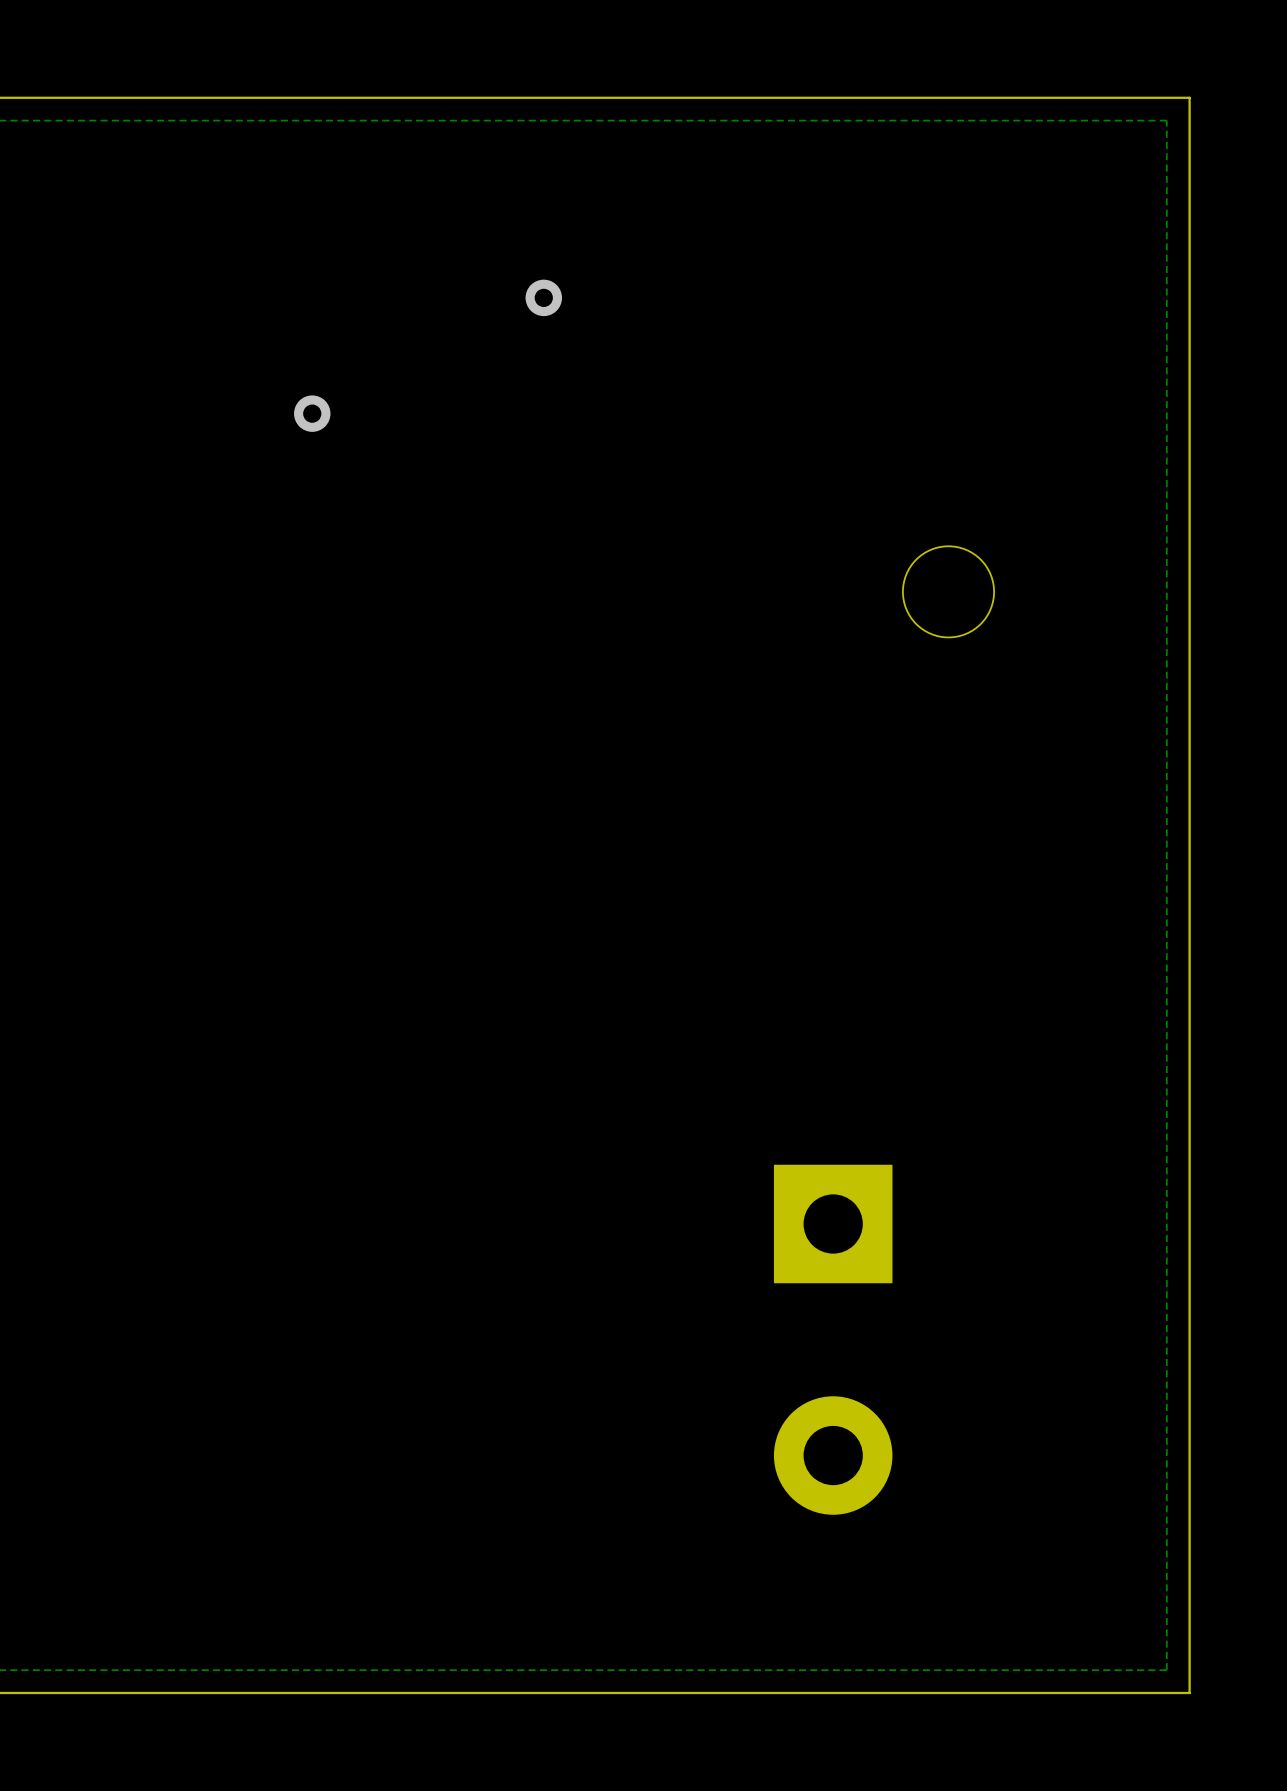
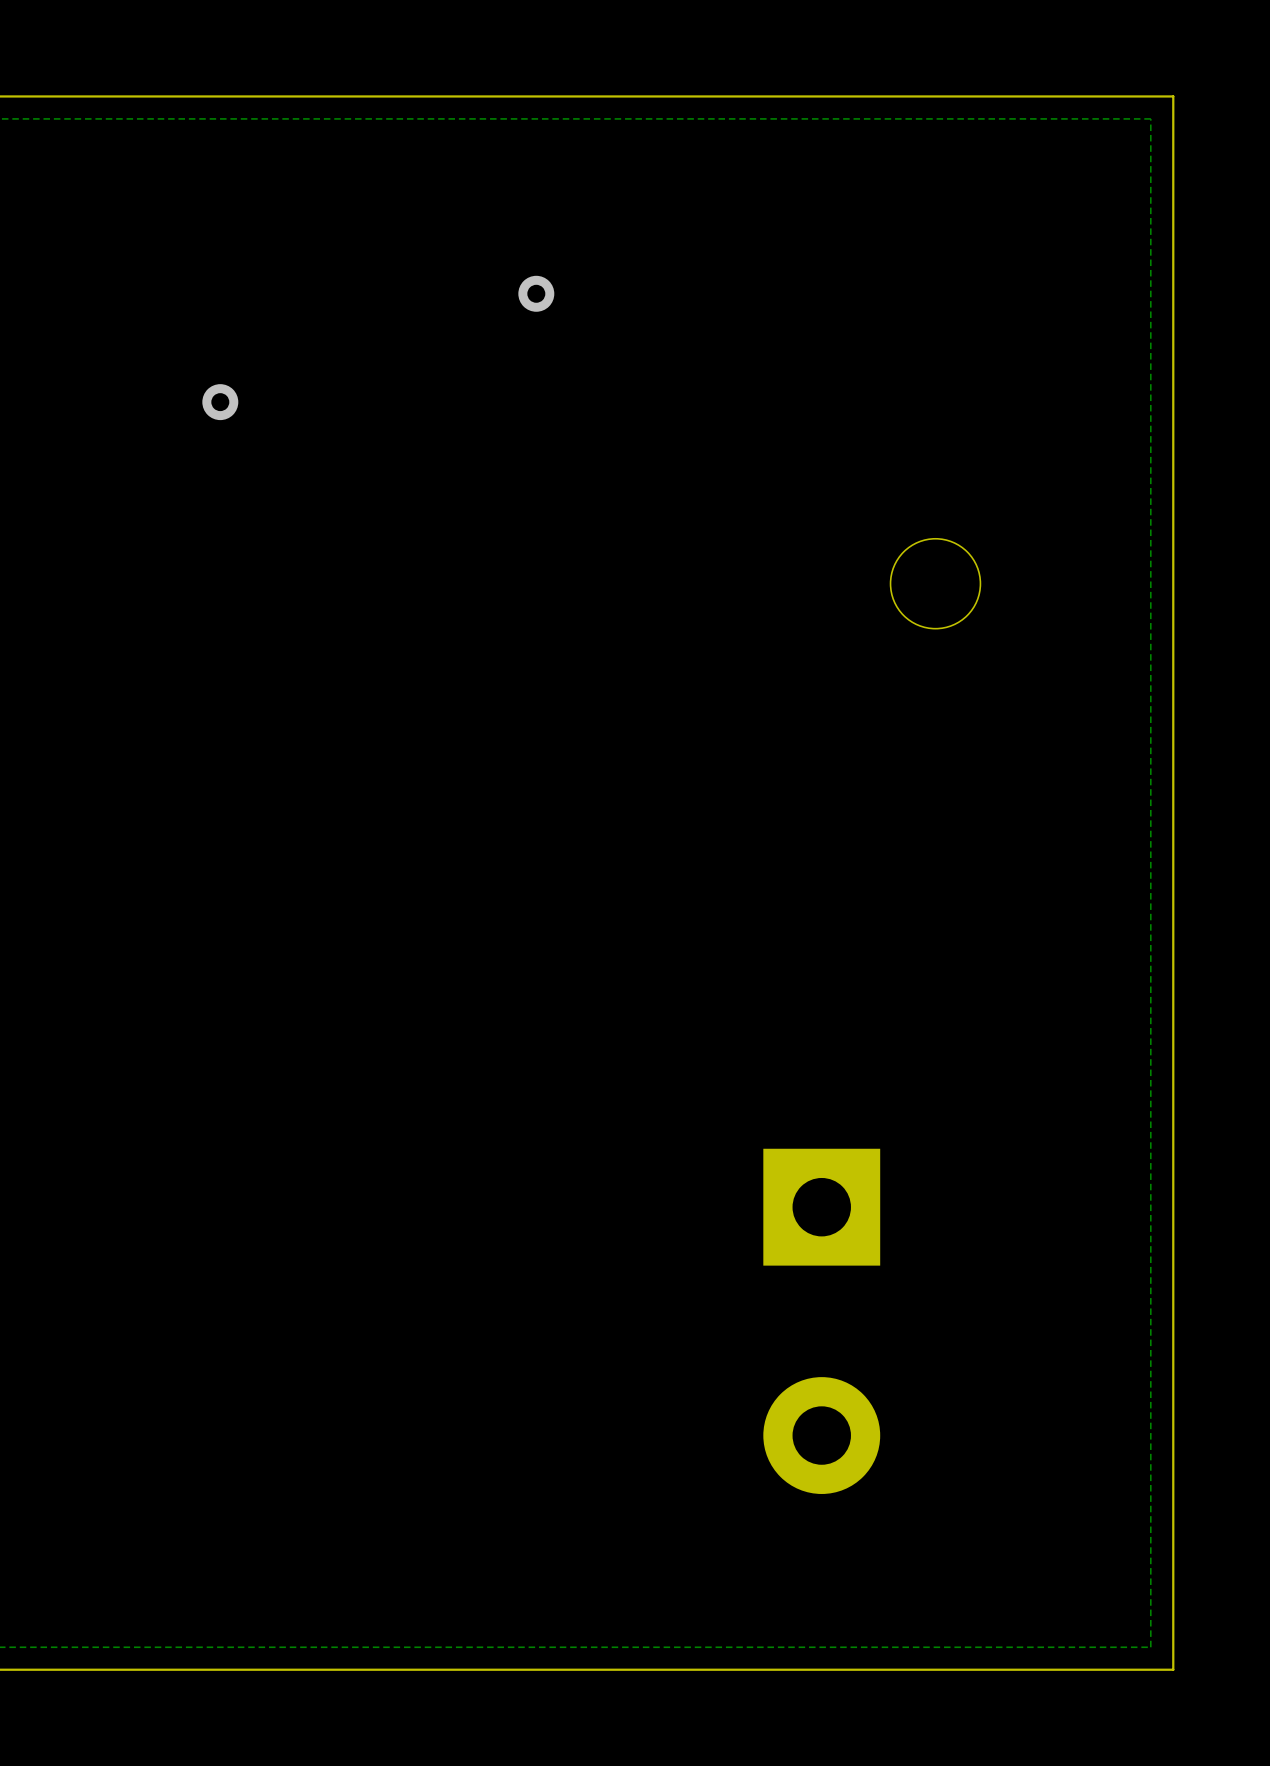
via position: (312, 413) -> (220, 402)

